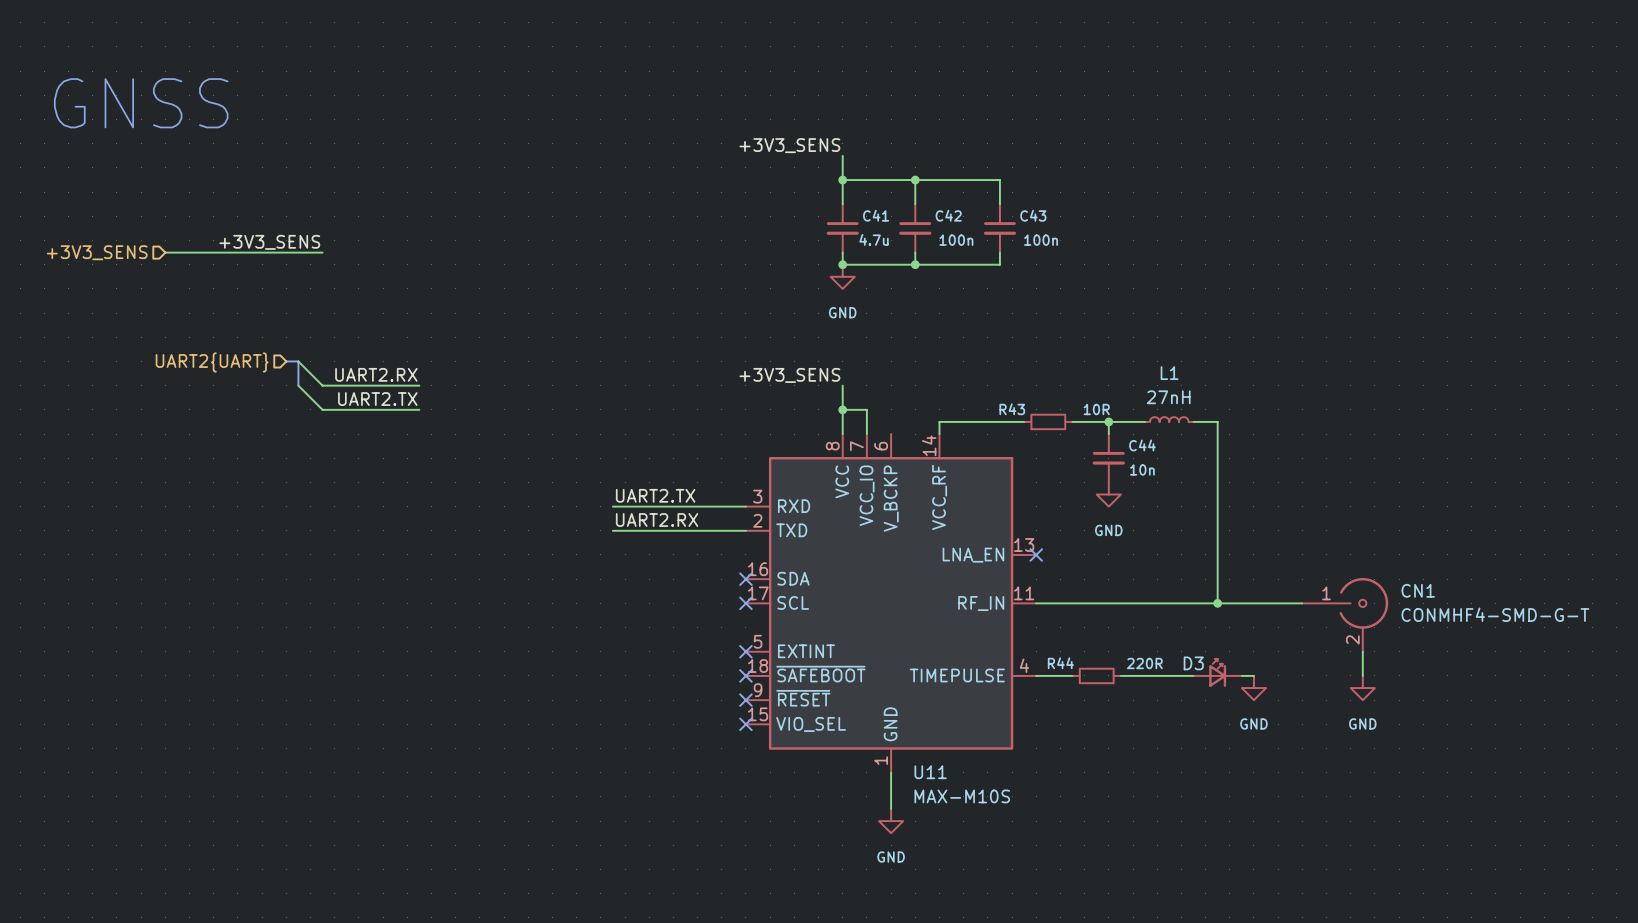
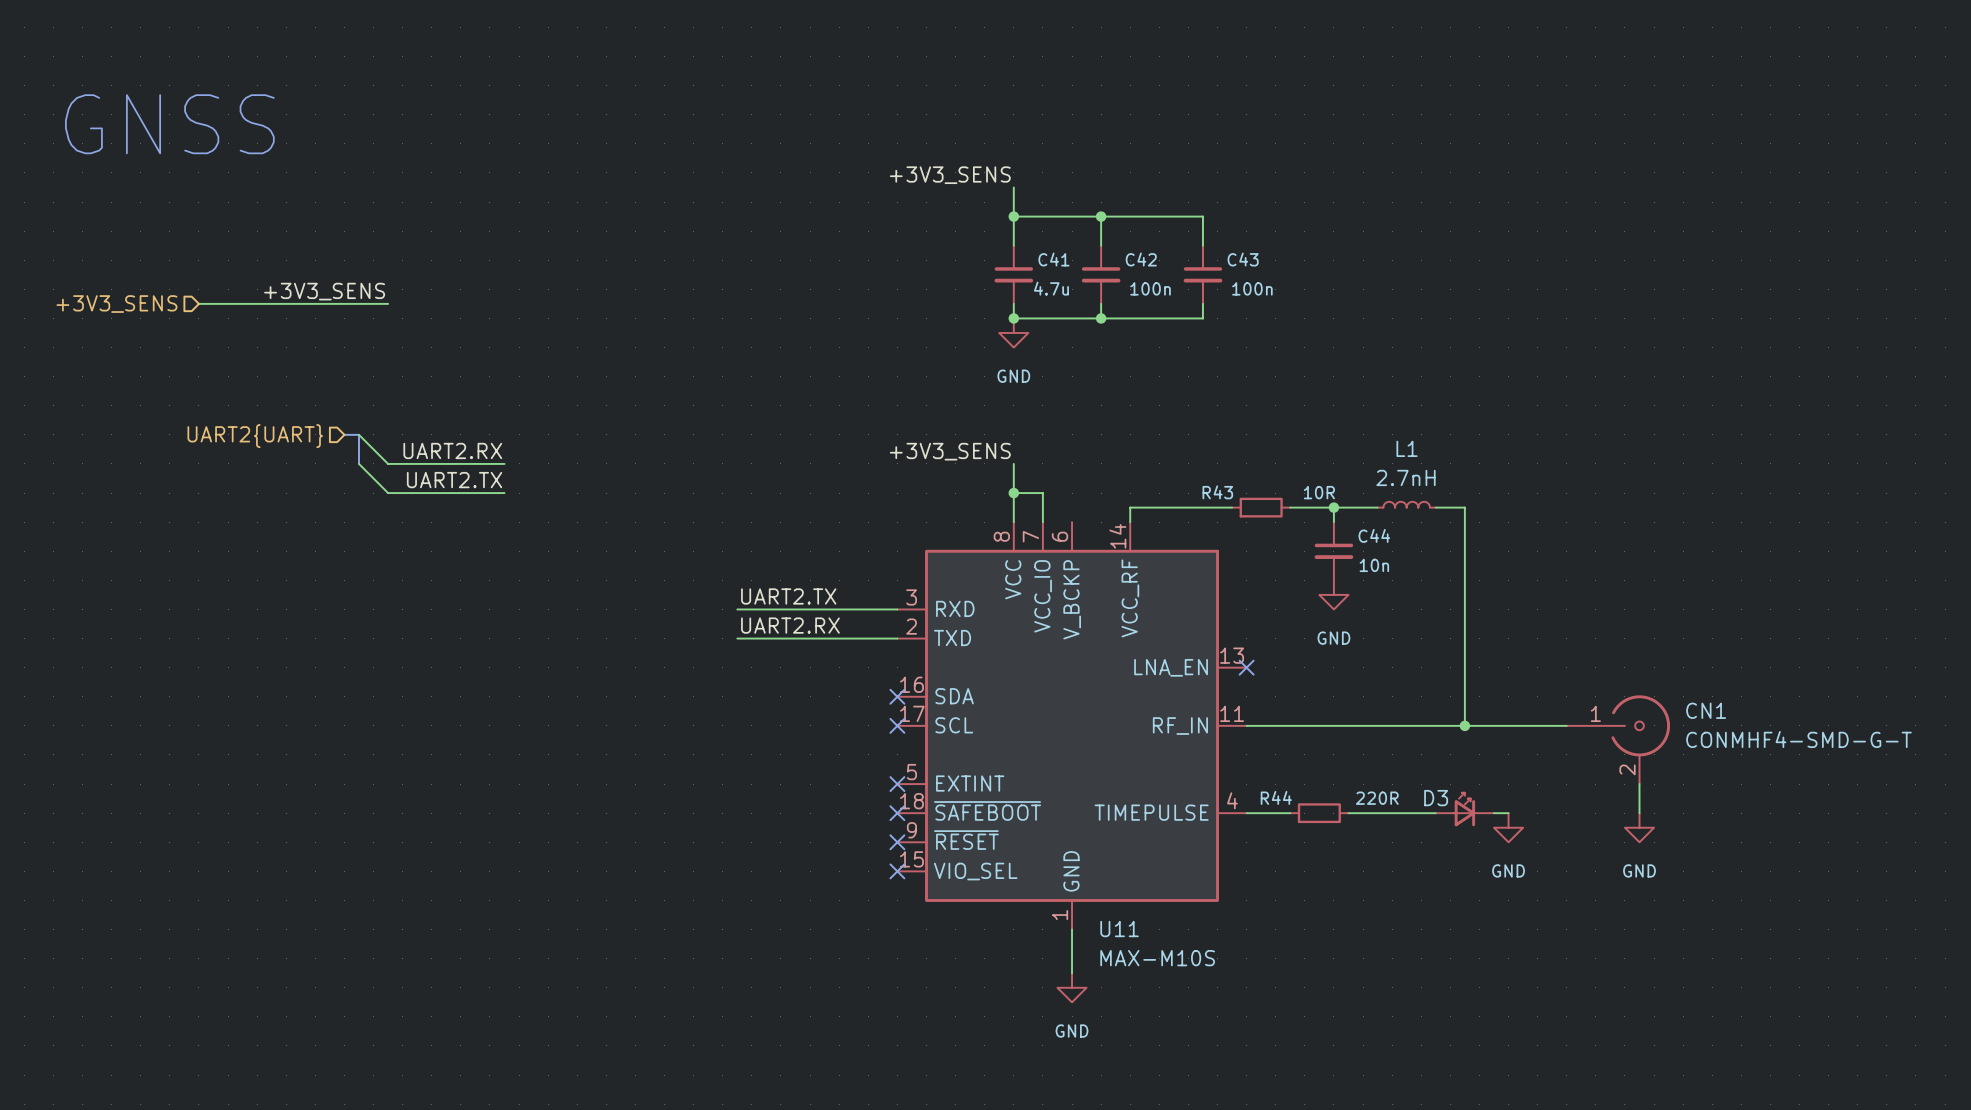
L1 value: 27nH (1168, 397) -> 2.7nH (1405, 477)

